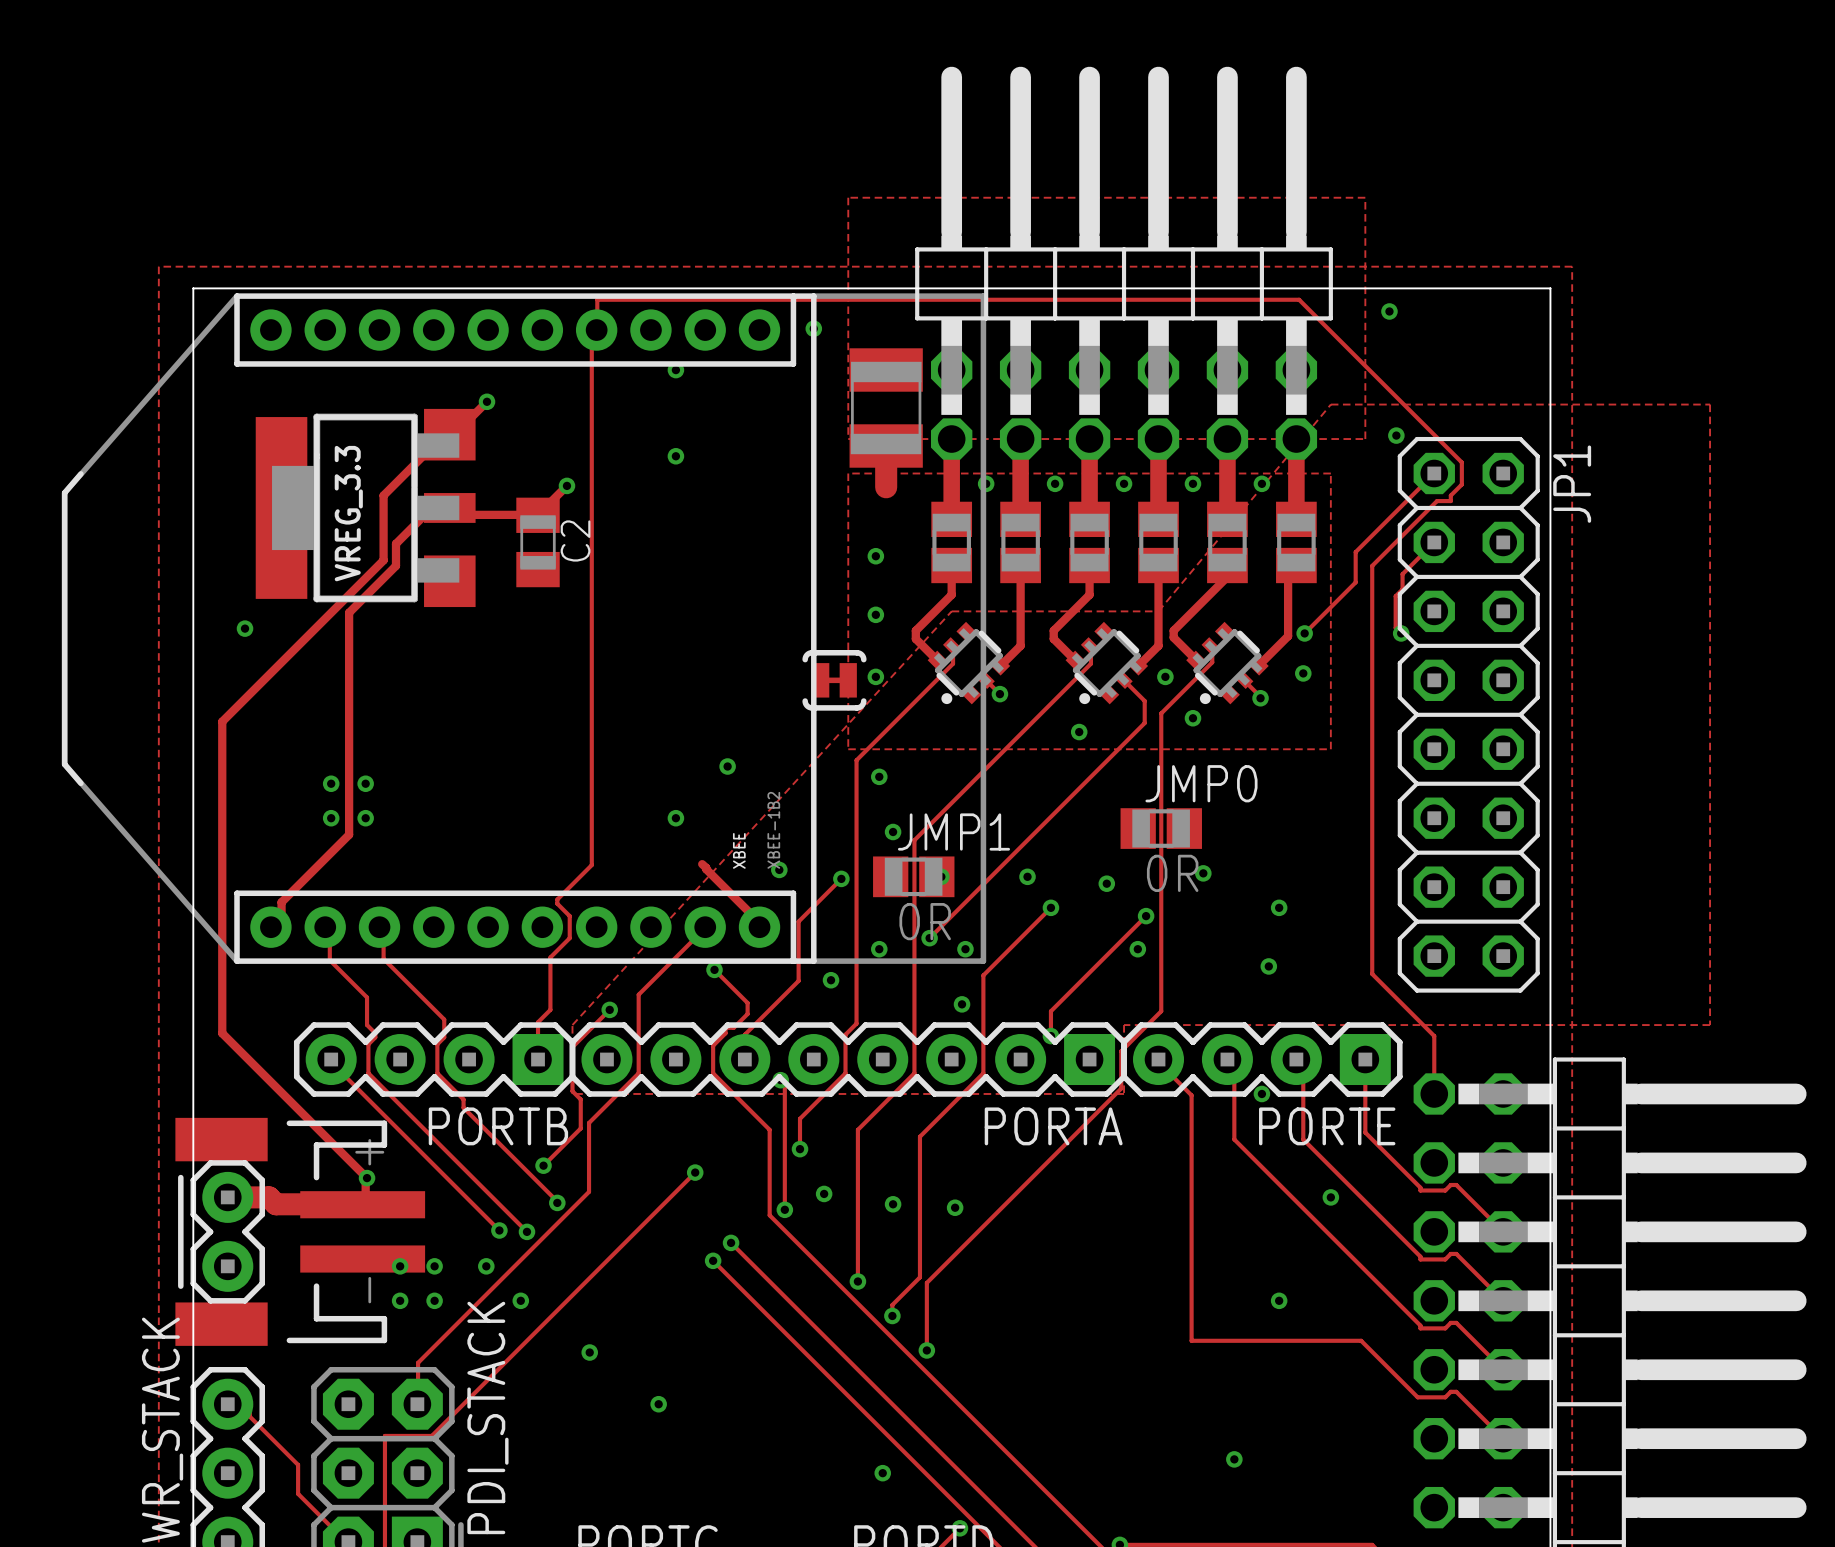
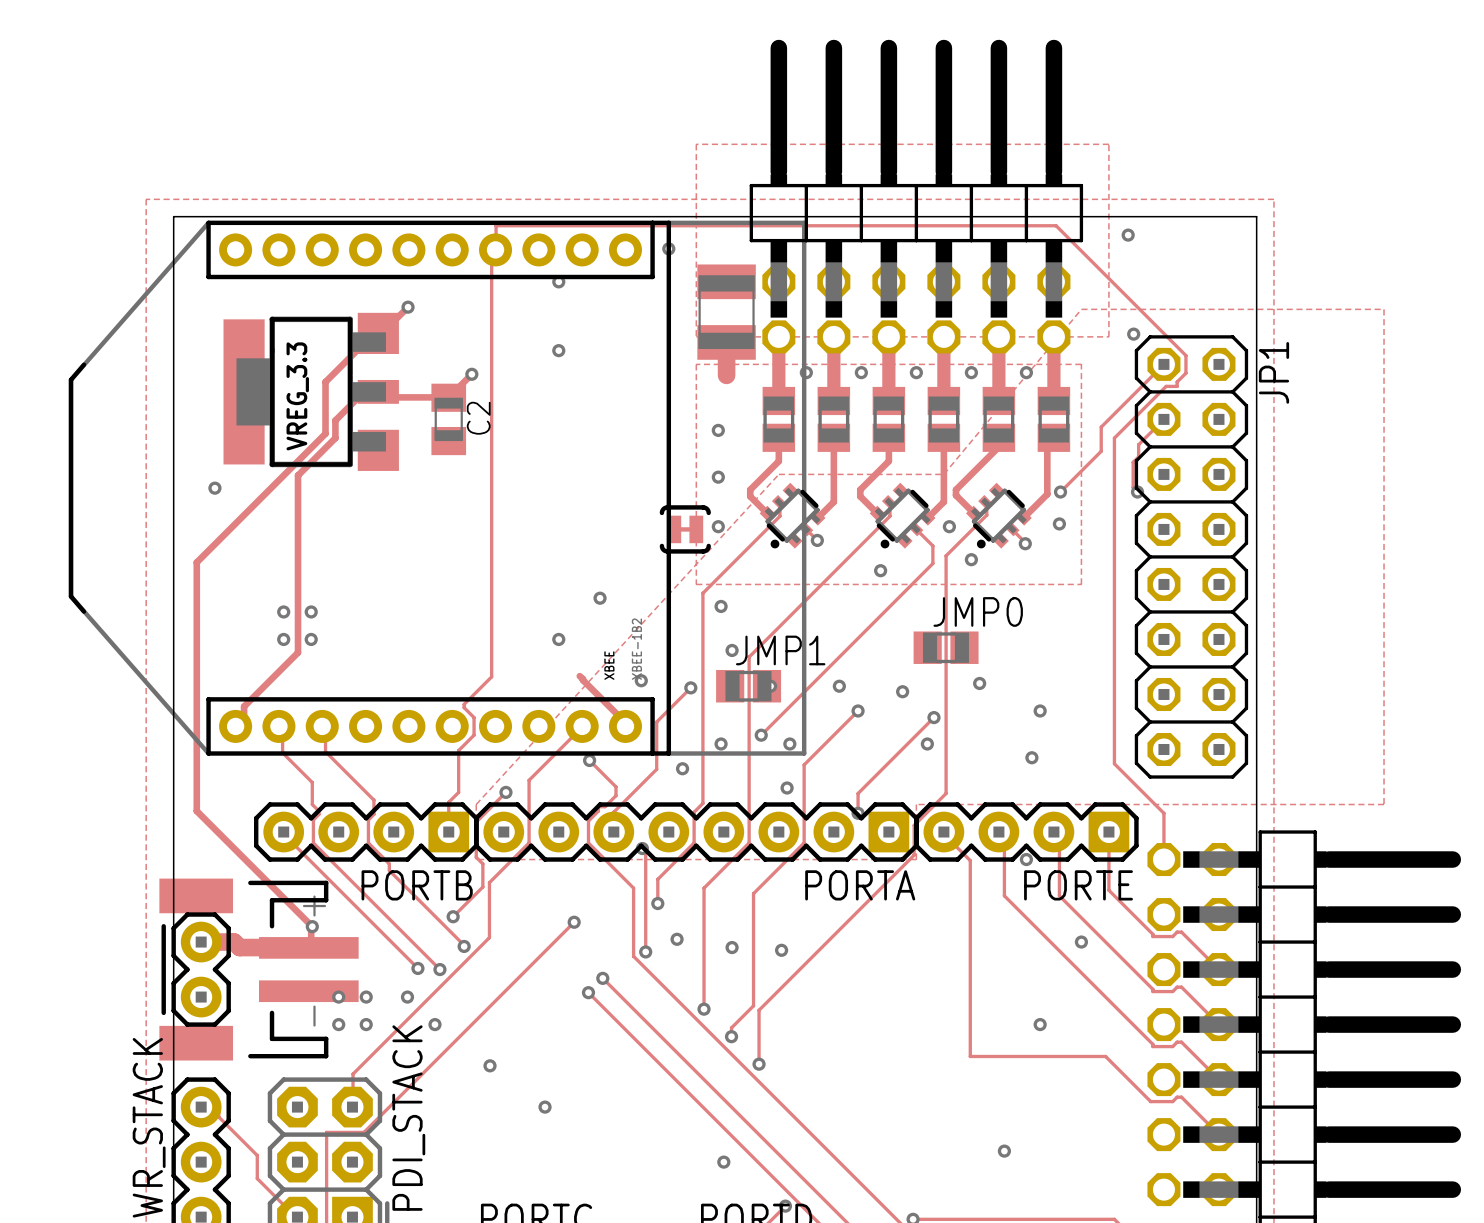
JMP0 value: 0R (1172, 873) -> none
JMP1 value: 0R (925, 921) -> none

